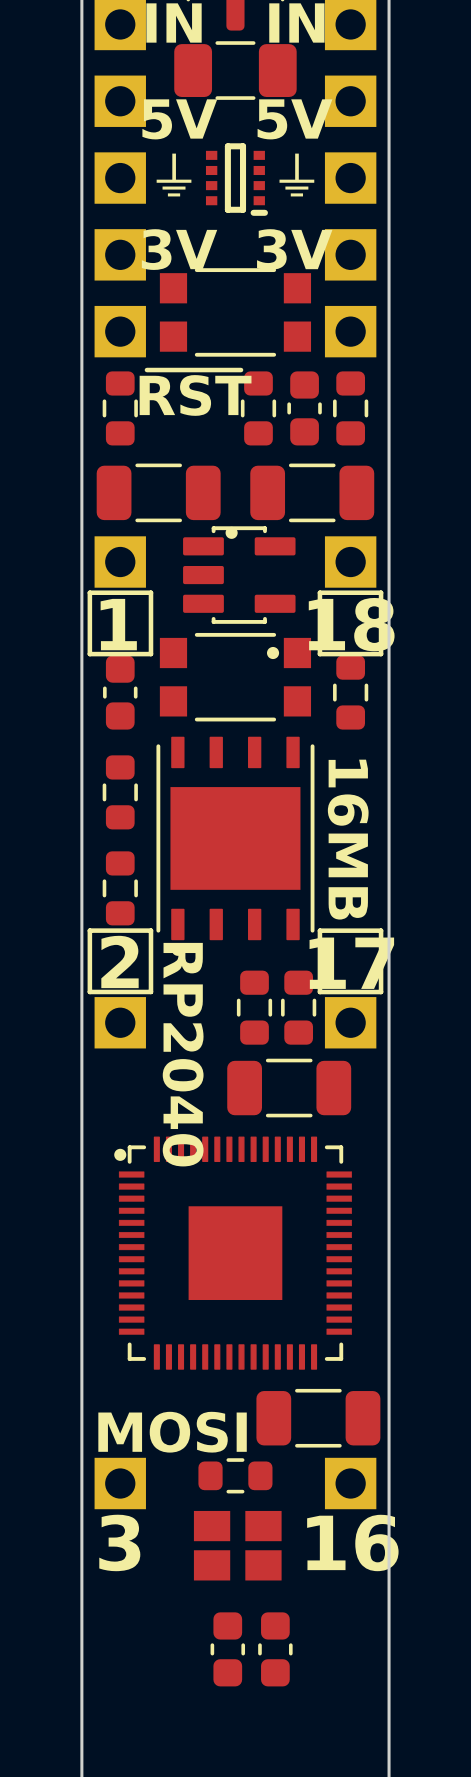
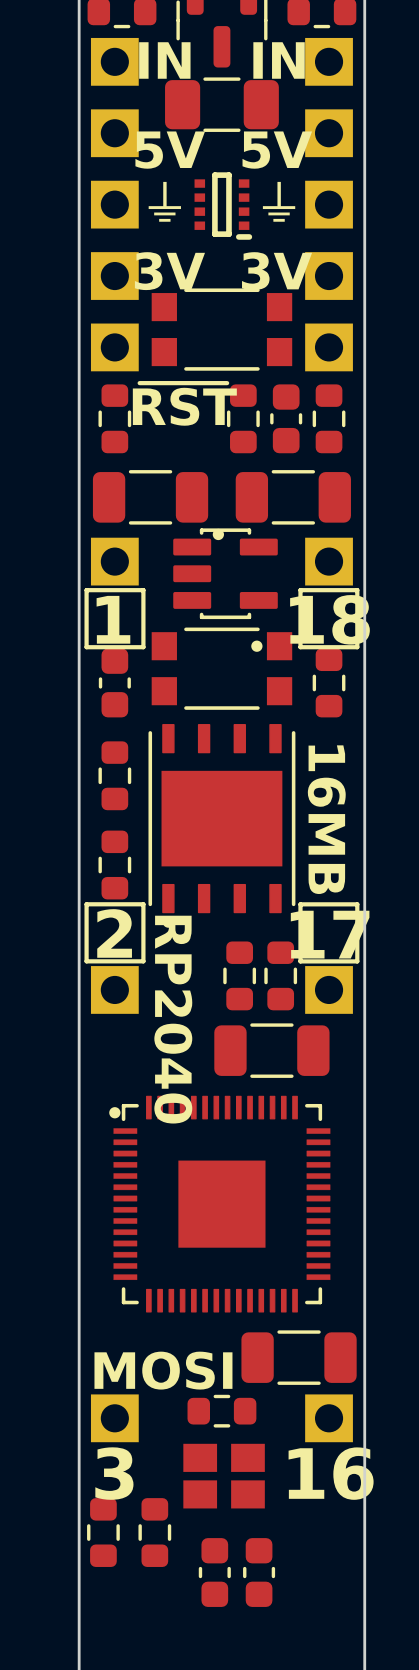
part: none -> (103, 1532)
part: none -> (154, 1532)

